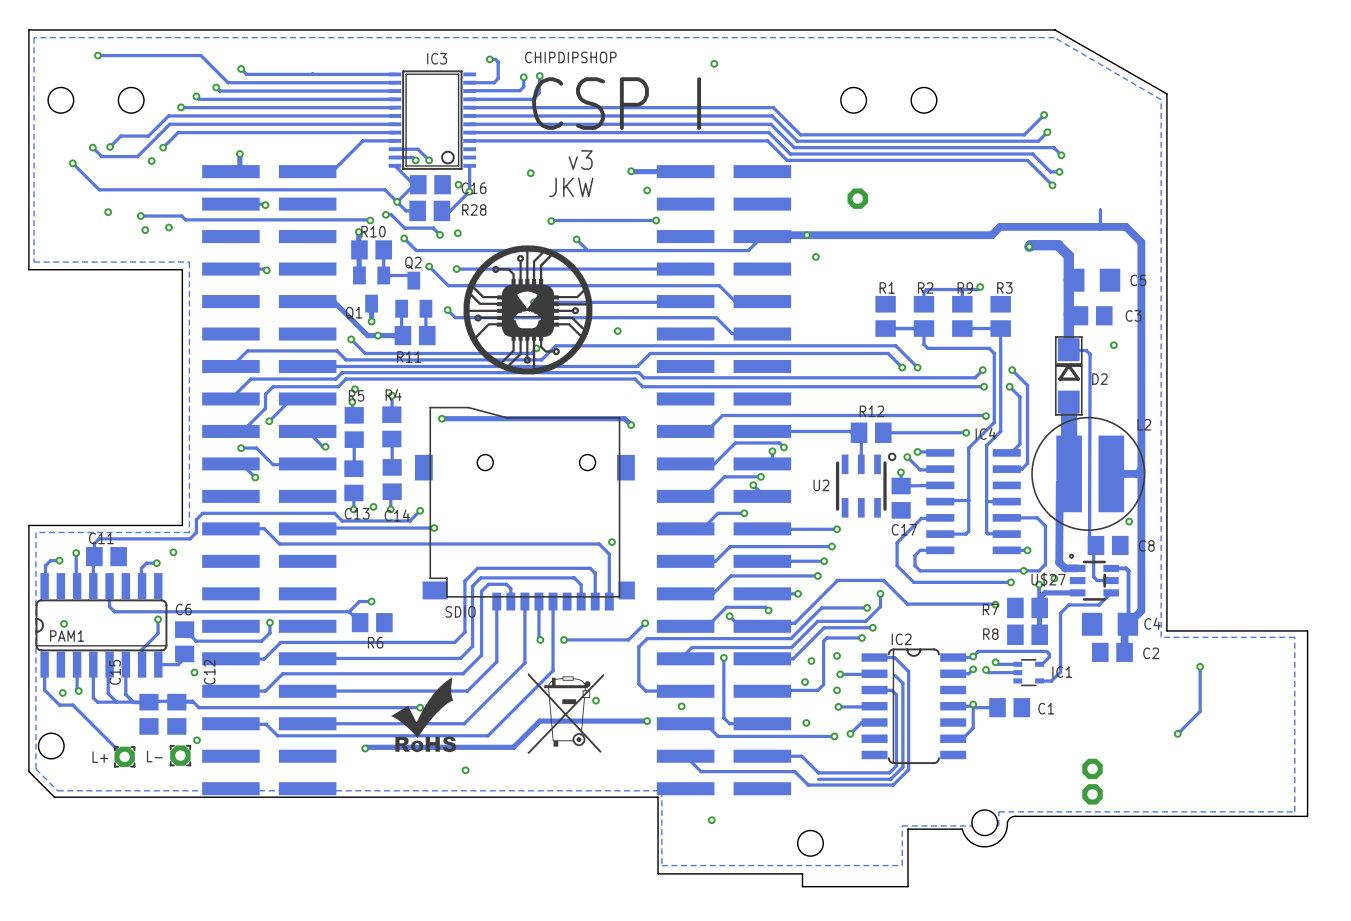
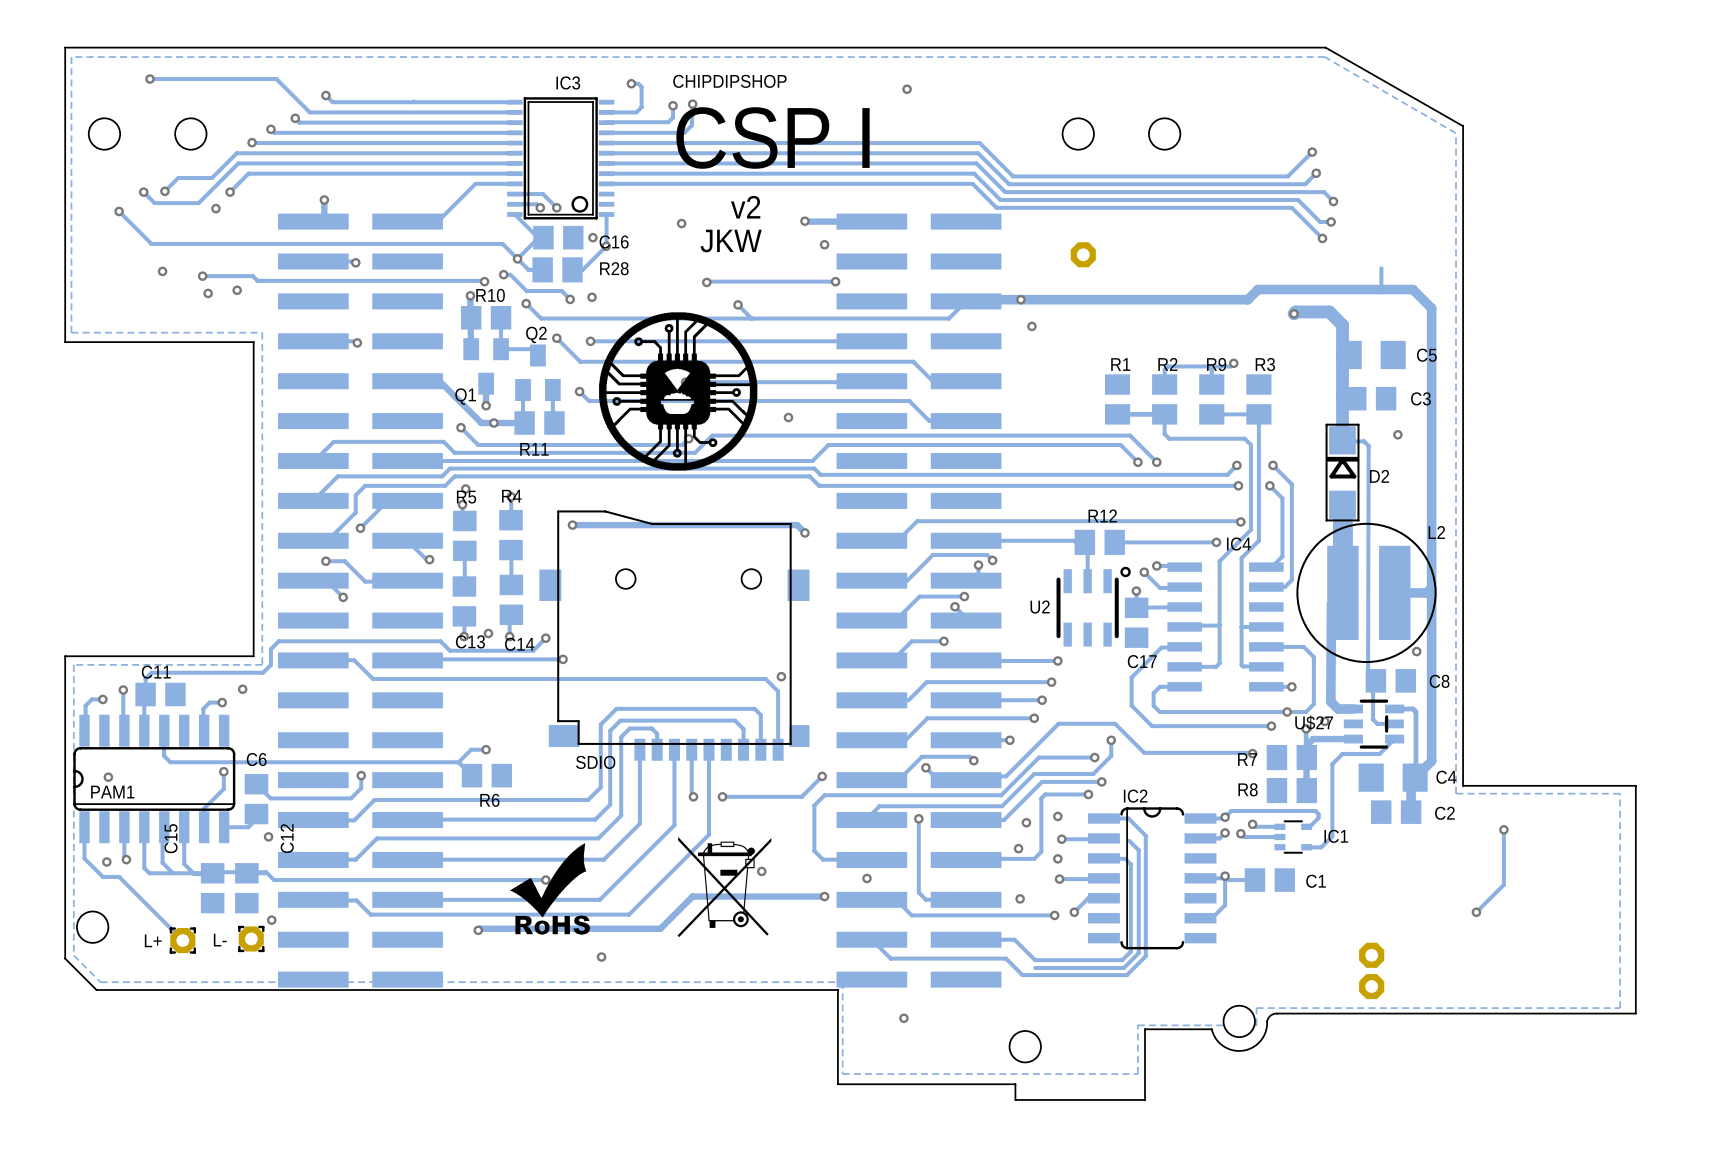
text: v3 (580, 160) -> v2 (745, 207)
U$27 footprint: [1069, 553, 1119, 601] -> [1343, 699, 1405, 749]

